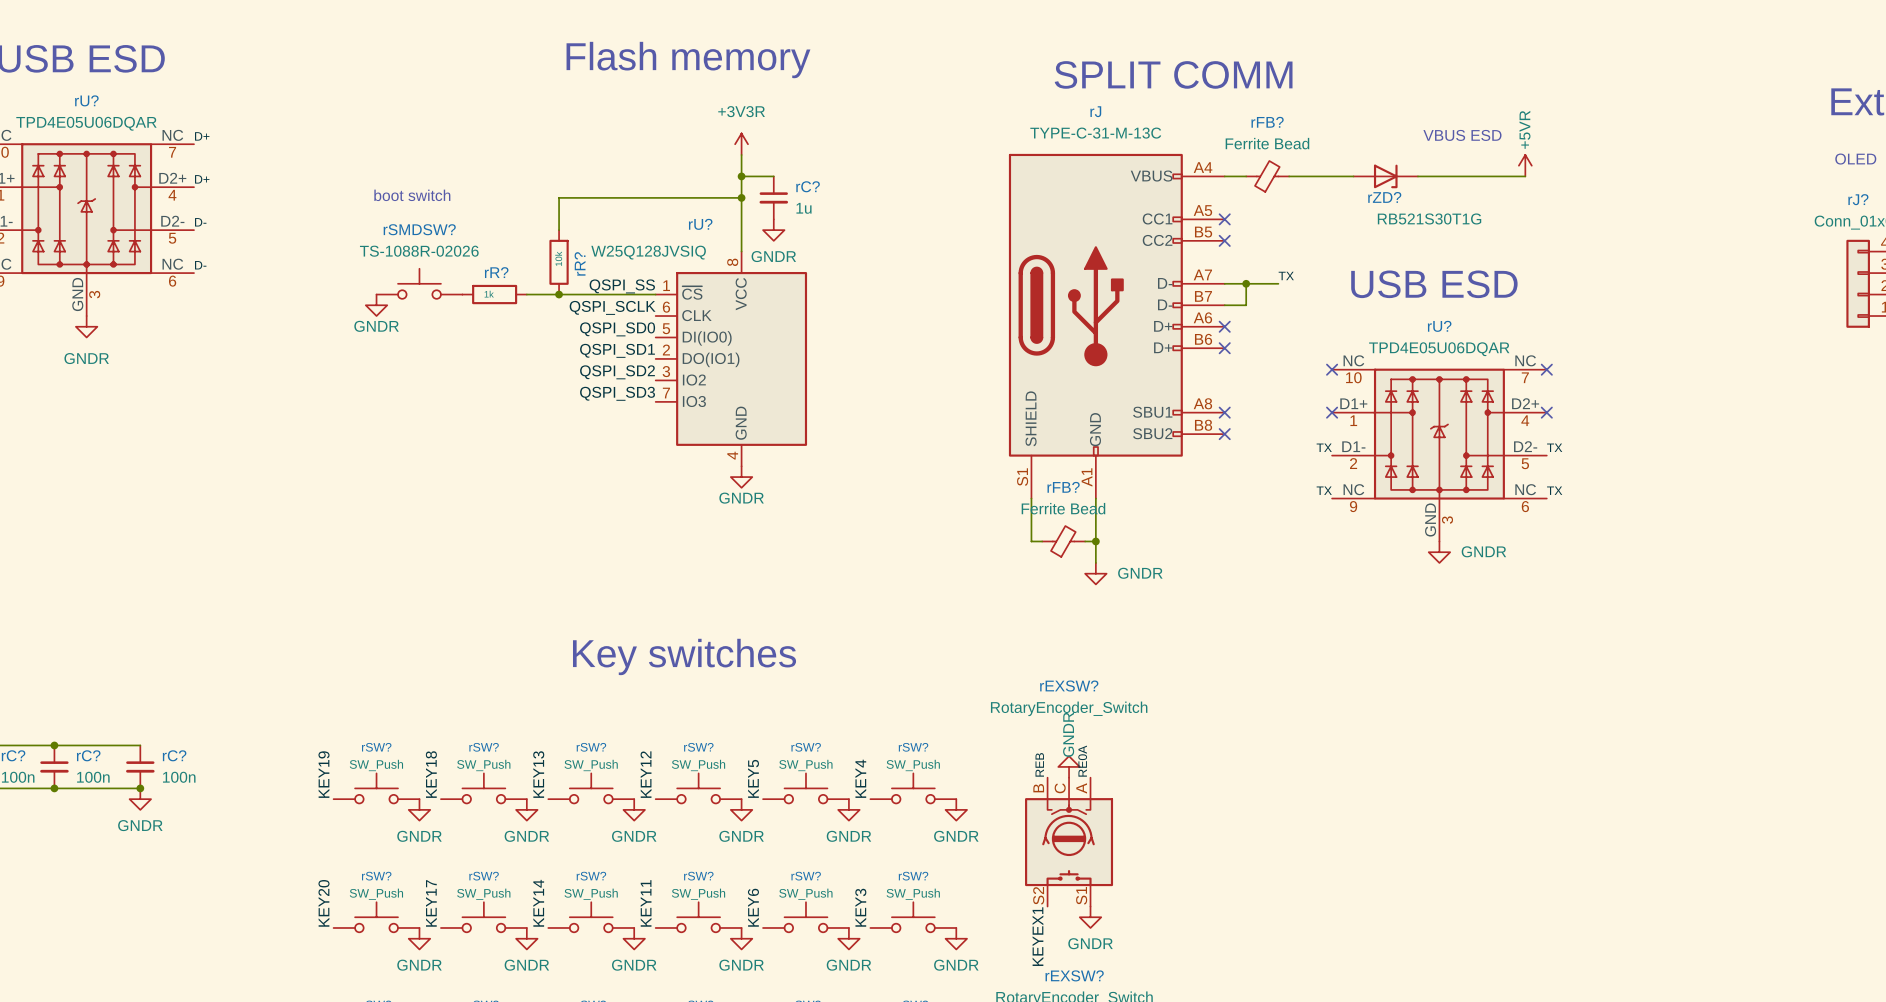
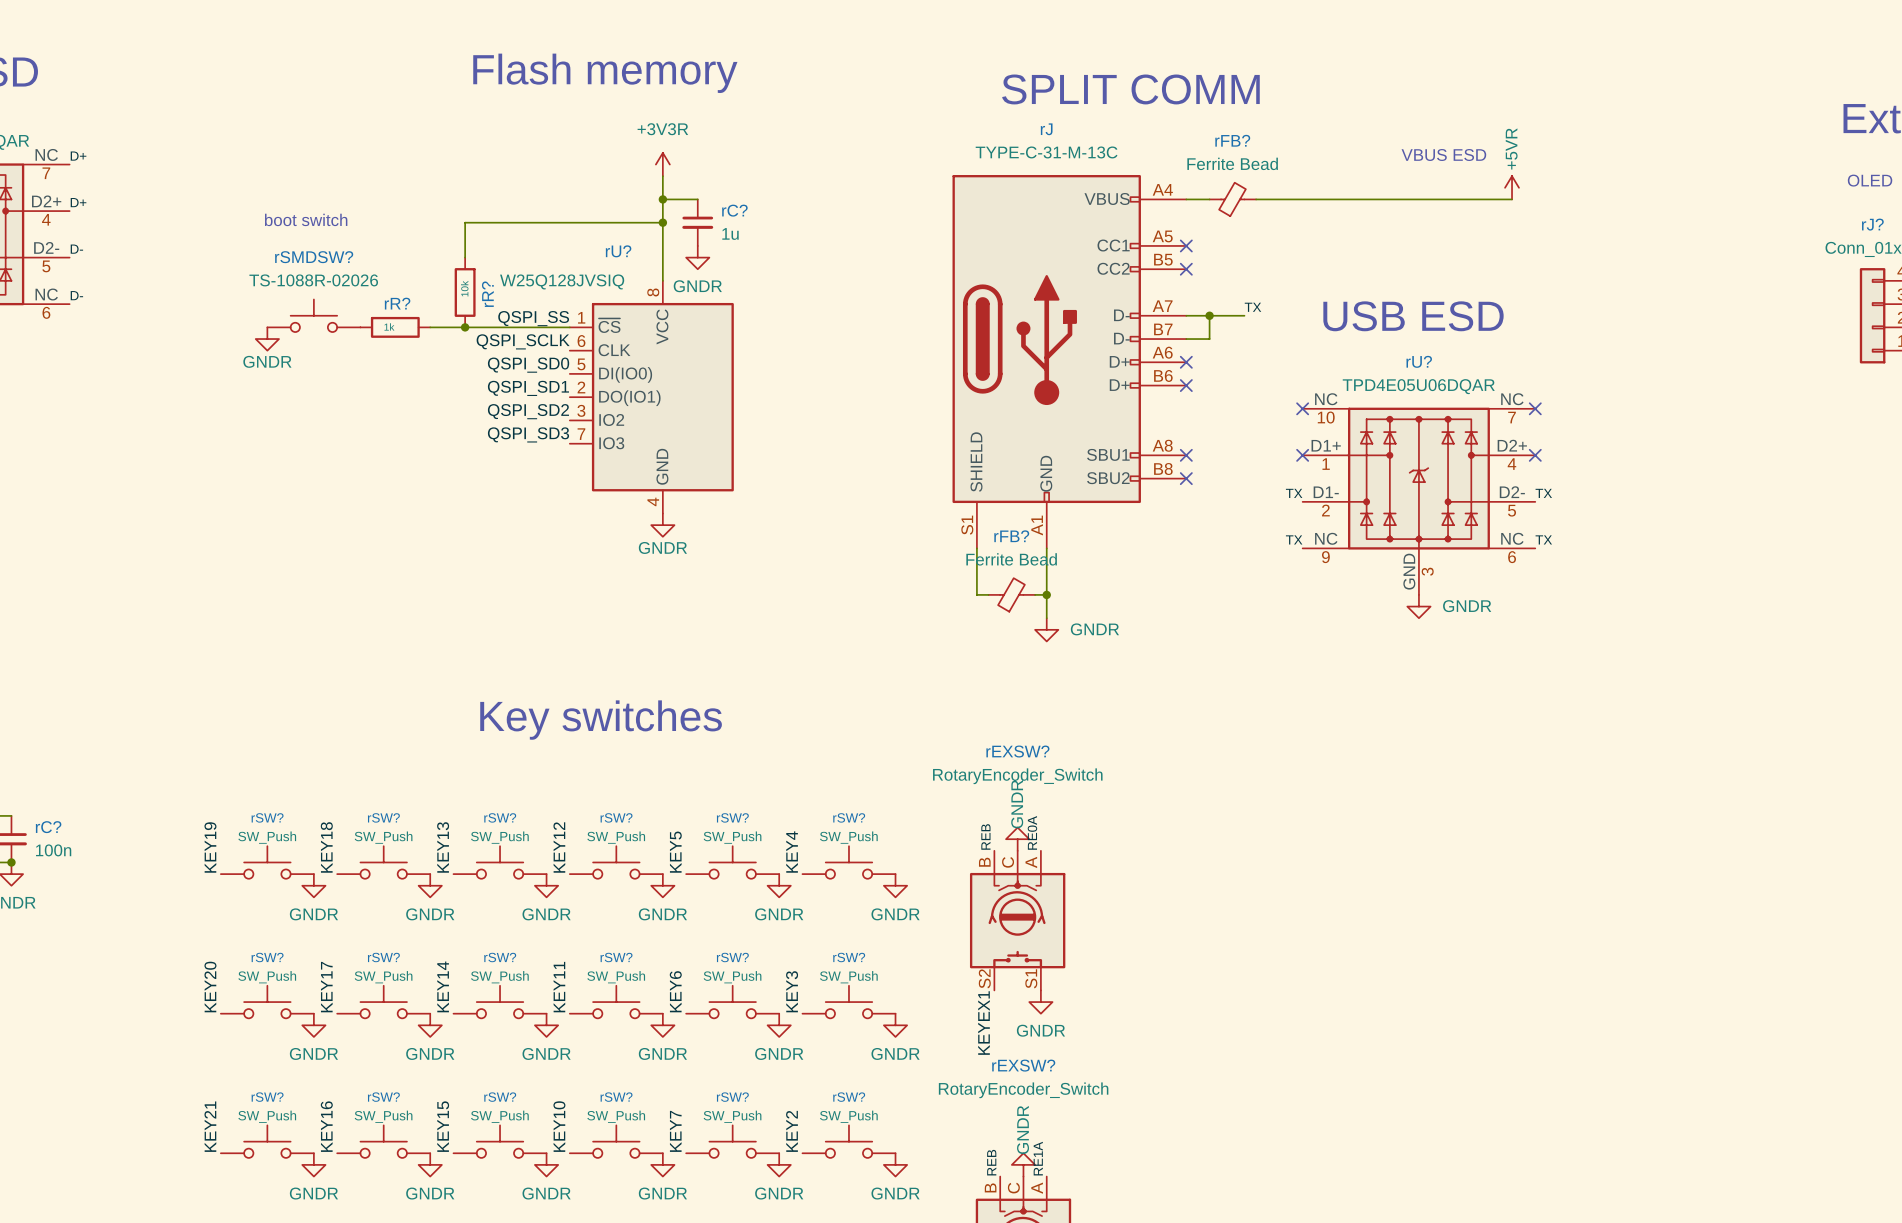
rZD?: RB521S30T1G (1385, 176) -> none

